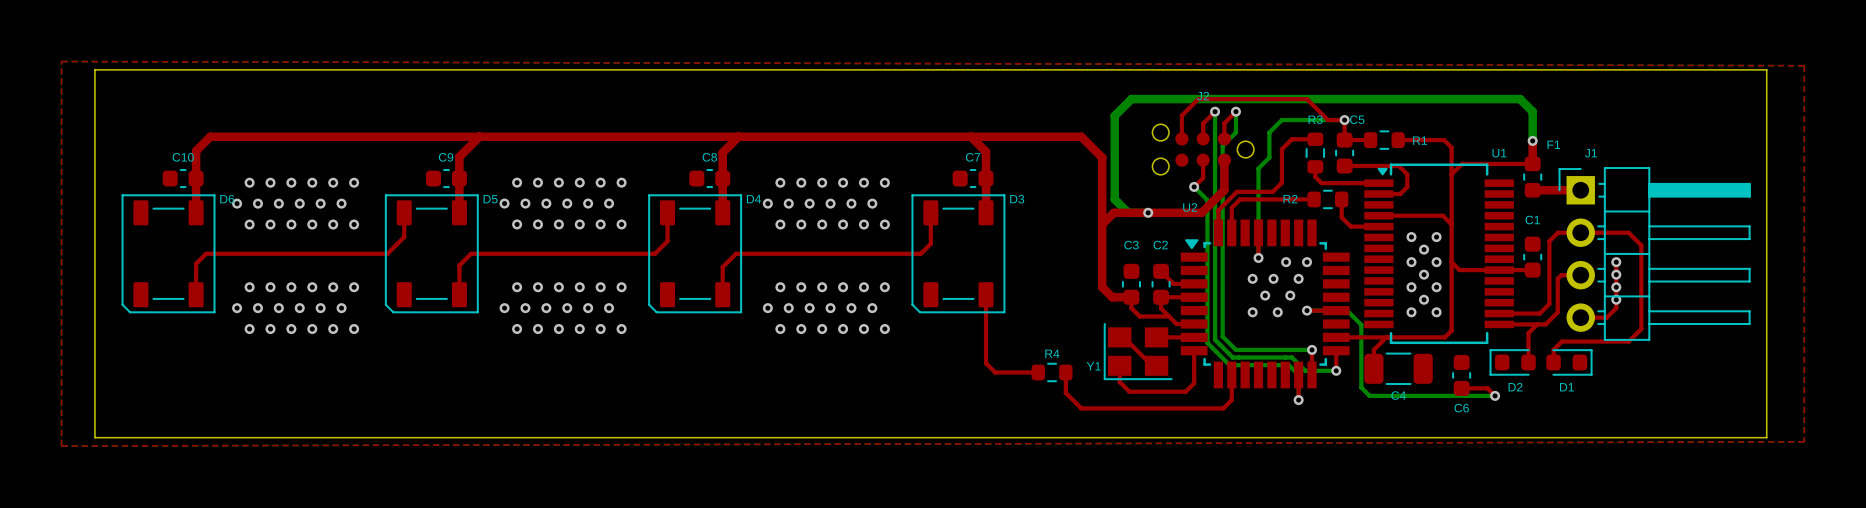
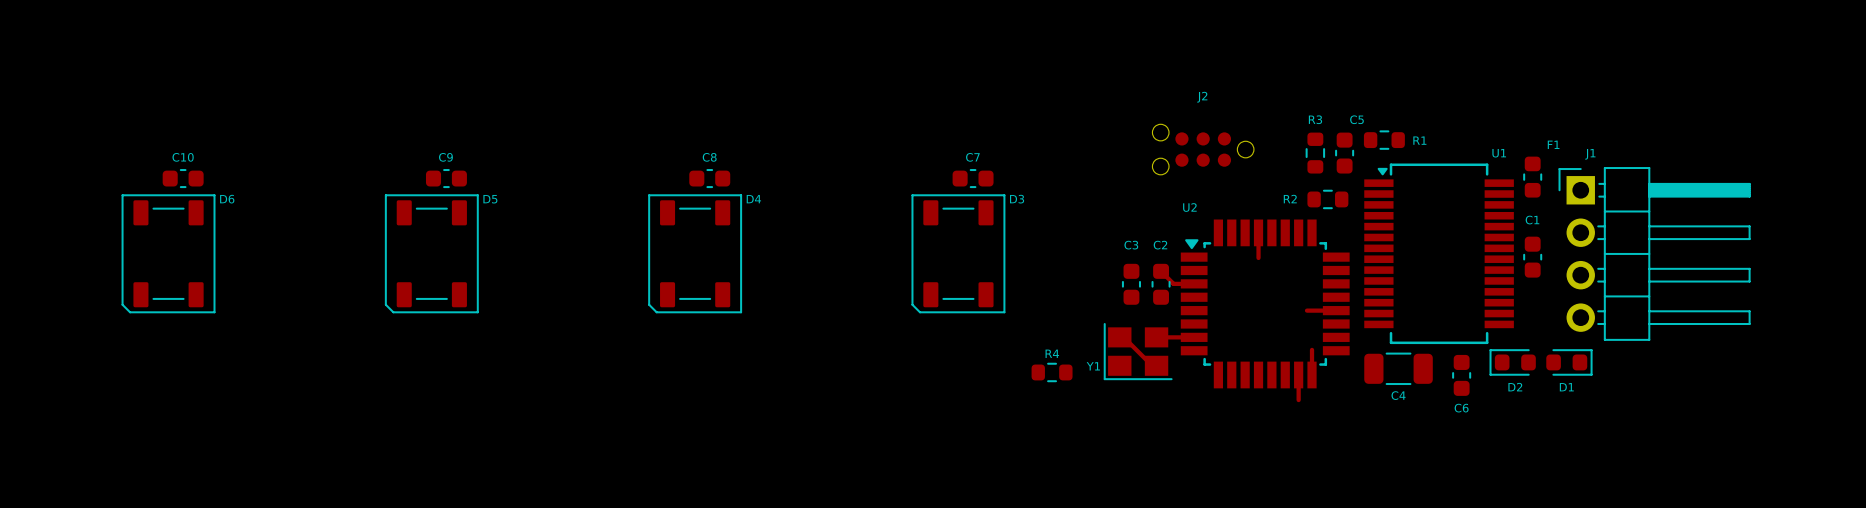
top zone outline: (61, 61) (1804, 65) (1804, 441) (61, 446) (61, 61) -> none
board edge: (94, 69) (1766, 69) (1766, 437) (94, 437) (94, 69) -> none
top track: (1215, 111) (1203, 123) (1203, 138) -> none
bottom track: (1215, 111) (1215, 339) (1232, 357) (1291, 357) (1305, 370) (1336, 370) -> none
via: (1215, 111) -> none
top track: (1235, 111) (1224, 123) (1224, 138) -> none
bottom track: (1235, 111) (1235, 132) (1222, 145) (1222, 336) (1235, 349) (1311, 349) -> none
via: (1235, 111) -> none
bottom track: (1344, 120) (1281, 120) (1269, 132) (1269, 157) (1258, 168) (1258, 257) -> none
via: (1344, 120) -> none
top track: (479, 136) (459, 156) (459, 212) -> none
top track: (738, 136) (722, 152) (722, 212) -> none
top track: (970, 136) (986, 151) (986, 212) -> none
top track: (1181, 138) (1181, 115) (1198, 99) (1307, 99) (1327, 120) (1344, 120) (1344, 140) (1370, 140) -> none
top track: (1315, 139) (1291, 139) (1281, 149) (1281, 182) (1272, 191) (1236, 191) (1218, 210) (1218, 232) -> none
top track: (1398, 140) (1444, 140) (1451, 147) (1451, 330) (1444, 337) (1336, 337) -> none
top track: (1532, 140) (1532, 163) (1462, 163) (1451, 174) -> none
bottom track: (1532, 140) (1532, 111) (1520, 99) (1131, 99) (1114, 115) (1114, 199) (1128, 212) (1147, 211) -> none
via: (1532, 140) -> none
top track: (1203, 160) (1203, 177) (1194, 186) -> none
top track: (1224, 160) (1224, 190) (1201, 212) (1113, 212) (1102, 224) -> none
top track: (1315, 166) (1315, 176) (1321, 183) (1378, 183) -> none
top track: (1344, 166) (1398, 166) (1407, 174) (1407, 186) (1400, 194) (1378, 194) -> none
via: (249, 182) -> none
via: (270, 182) -> none
via: (291, 182) -> none
via: (312, 182) -> none
via: (333, 182) -> none
via: (354, 182) -> none
via: (517, 182) -> none
via: (537, 182) -> none
via: (558, 182) -> none
via: (579, 182) -> none
via: (600, 182) -> none
via: (621, 182) -> none
via: (780, 182) -> none
via: (801, 182) -> none
via: (822, 182) -> none
via: (843, 182) -> none
via: (863, 182) -> none
via: (884, 182) -> none
bottom track: (1194, 186) (1207, 200) (1207, 342) (1229, 365) (1288, 365) (1298, 374) (1298, 400) -> none
via: (1194, 186) -> none
top track: (1532, 190) (1580, 190) -> none
top track: (1314, 199) (1240, 199) (1231, 207) (1231, 232) -> none
top track: (1341, 199) (1341, 217) (1350, 226) (1378, 226) -> none
via: (237, 203) -> none
via: (257, 203) -> none
via: (278, 203) -> none
via: (299, 203) -> none
via: (320, 203) -> none
via: (341, 203) -> none
via: (504, 203) -> none
via: (525, 203) -> none
via: (546, 203) -> none
via: (567, 203) -> none
via: (588, 203) -> none
via: (609, 203) -> none
via: (767, 203) -> none
via: (788, 203) -> none
via: (809, 203) -> none
via: (830, 203) -> none
via: (851, 203) -> none
via: (872, 203) -> none
top track: (196, 212) (196, 150) (210, 136) (1081, 136) (1102, 157) (1102, 287) (1112, 297) (1131, 297) (1131, 308) (1139, 316) (1169, 316) -> none
top track: (404, 212) (404, 237) (387, 253) (206, 253) (196, 263) (196, 294) -> none
top track: (667, 212) (667, 241) (655, 253) (471, 253) (459, 265) (459, 294) -> none
top track: (930, 212) (930, 243) (920, 253) (736, 253) (722, 267) (722, 294) -> none
via: (1148, 212) -> none
top track: (1378, 215) (1442, 215) (1451, 224) -> none
via: (249, 224) -> none
via: (270, 224) -> none
via: (291, 224) -> none
via: (312, 224) -> none
via: (333, 224) -> none
via: (354, 224) -> none
via: (517, 224) -> none
via: (537, 224) -> none
via: (558, 224) -> none
via: (579, 224) -> none
via: (600, 224) -> none
via: (621, 224) -> none
via: (780, 224) -> none
via: (801, 224) -> none
via: (822, 224) -> none
via: (843, 224) -> none
via: (863, 224) -> none
via: (884, 224) -> none
via: (1411, 237) -> none
via: (1436, 237) -> none
via: (1424, 249) -> none
via: (1258, 257) -> none
via: (1286, 262) -> none
via: (1307, 262) -> none
via: (1411, 262) -> none
via: (1436, 262) -> none
top track: (1451, 262) (1459, 270) (1532, 270) -> none
top track: (1616, 262) (1616, 308) (1606, 317) (1580, 317) -> none
via: (1616, 262) -> none
via: (1424, 274) -> none
via: (1616, 274) -> none
top track: (1580, 275) (1561, 275) (1557, 278) (1557, 312) (1545, 324) (1499, 324) -> none
via: (1252, 278) -> none
via: (1273, 278) -> none
via: (1298, 278) -> none
via: (249, 287) -> none
via: (270, 287) -> none
via: (291, 287) -> none
via: (312, 287) -> none
via: (333, 287) -> none
via: (354, 287) -> none
via: (517, 287) -> none
via: (537, 287) -> none
via: (558, 287) -> none
via: (579, 287) -> none
via: (600, 287) -> none
via: (621, 287) -> none
via: (780, 287) -> none
via: (801, 287) -> none
via: (822, 287) -> none
via: (843, 287) -> none
via: (863, 287) -> none
via: (884, 287) -> none
via: (1411, 287) -> none
via: (1436, 287) -> none
via: (1616, 287) -> none
top track: (986, 294) (986, 363) (995, 372) (1038, 372) -> none
via: (1265, 295) -> none
via: (1290, 295) -> none
top track: (1194, 297) (1161, 297) (1161, 308) (1176, 324) (1194, 324) -> none
via: (1424, 299) -> none
via: (1616, 299) -> none
via: (237, 308) -> none
via: (257, 308) -> none
via: (278, 308) -> none
via: (299, 308) -> none
via: (320, 308) -> none
via: (341, 308) -> none
via: (504, 308) -> none
via: (525, 308) -> none
via: (546, 308) -> none
via: (567, 308) -> none
via: (588, 308) -> none
via: (609, 308) -> none
via: (767, 308) -> none
via: (788, 308) -> none
via: (809, 308) -> none
via: (830, 308) -> none
via: (851, 308) -> none
via: (872, 308) -> none
bottom track: (1307, 310) (1347, 310) (1361, 324) (1361, 387) (1369, 395) (1495, 395) -> none
via: (1307, 310) -> none
via: (1252, 312) -> none
via: (1277, 312) -> none
via: (1411, 312) -> none
via: (1436, 312) -> none
top track: (1499, 313) (1539, 313) (1549, 303) (1549, 241) (1557, 232) (1628, 232) (1641, 245) (1641, 329) (1628, 341) (1561, 341) (1553, 349) (1553, 362) -> none
top track: (1537, 324) (1528, 333) (1528, 362) -> none
via: (249, 329) -> none
via: (270, 329) -> none
via: (291, 329) -> none
via: (312, 329) -> none
via: (333, 329) -> none
via: (354, 329) -> none
via: (517, 329) -> none
via: (537, 329) -> none
via: (558, 329) -> none
via: (579, 329) -> none
via: (600, 329) -> none
via: (621, 329) -> none
via: (780, 329) -> none
via: (801, 329) -> none
via: (822, 329) -> none
via: (843, 329) -> none
via: (863, 329) -> none
via: (884, 329) -> none
top track: (1386, 337) (1373, 349) (1373, 368) -> none
via: (1312, 349) -> none
top track: (1194, 350) (1194, 383) (1185, 391) (1129, 391) (1119, 382) (1119, 365) -> none
top track: (1336, 350) (1336, 370) -> none
via: (1336, 370) -> none
top track: (1065, 372) (1065, 392) (1081, 408) (1223, 408) (1231, 400) (1231, 374) -> none
top track: (1461, 388) (1487, 388) (1495, 395) -> none
via: (1495, 395) -> none
via: (1298, 400) -> none

